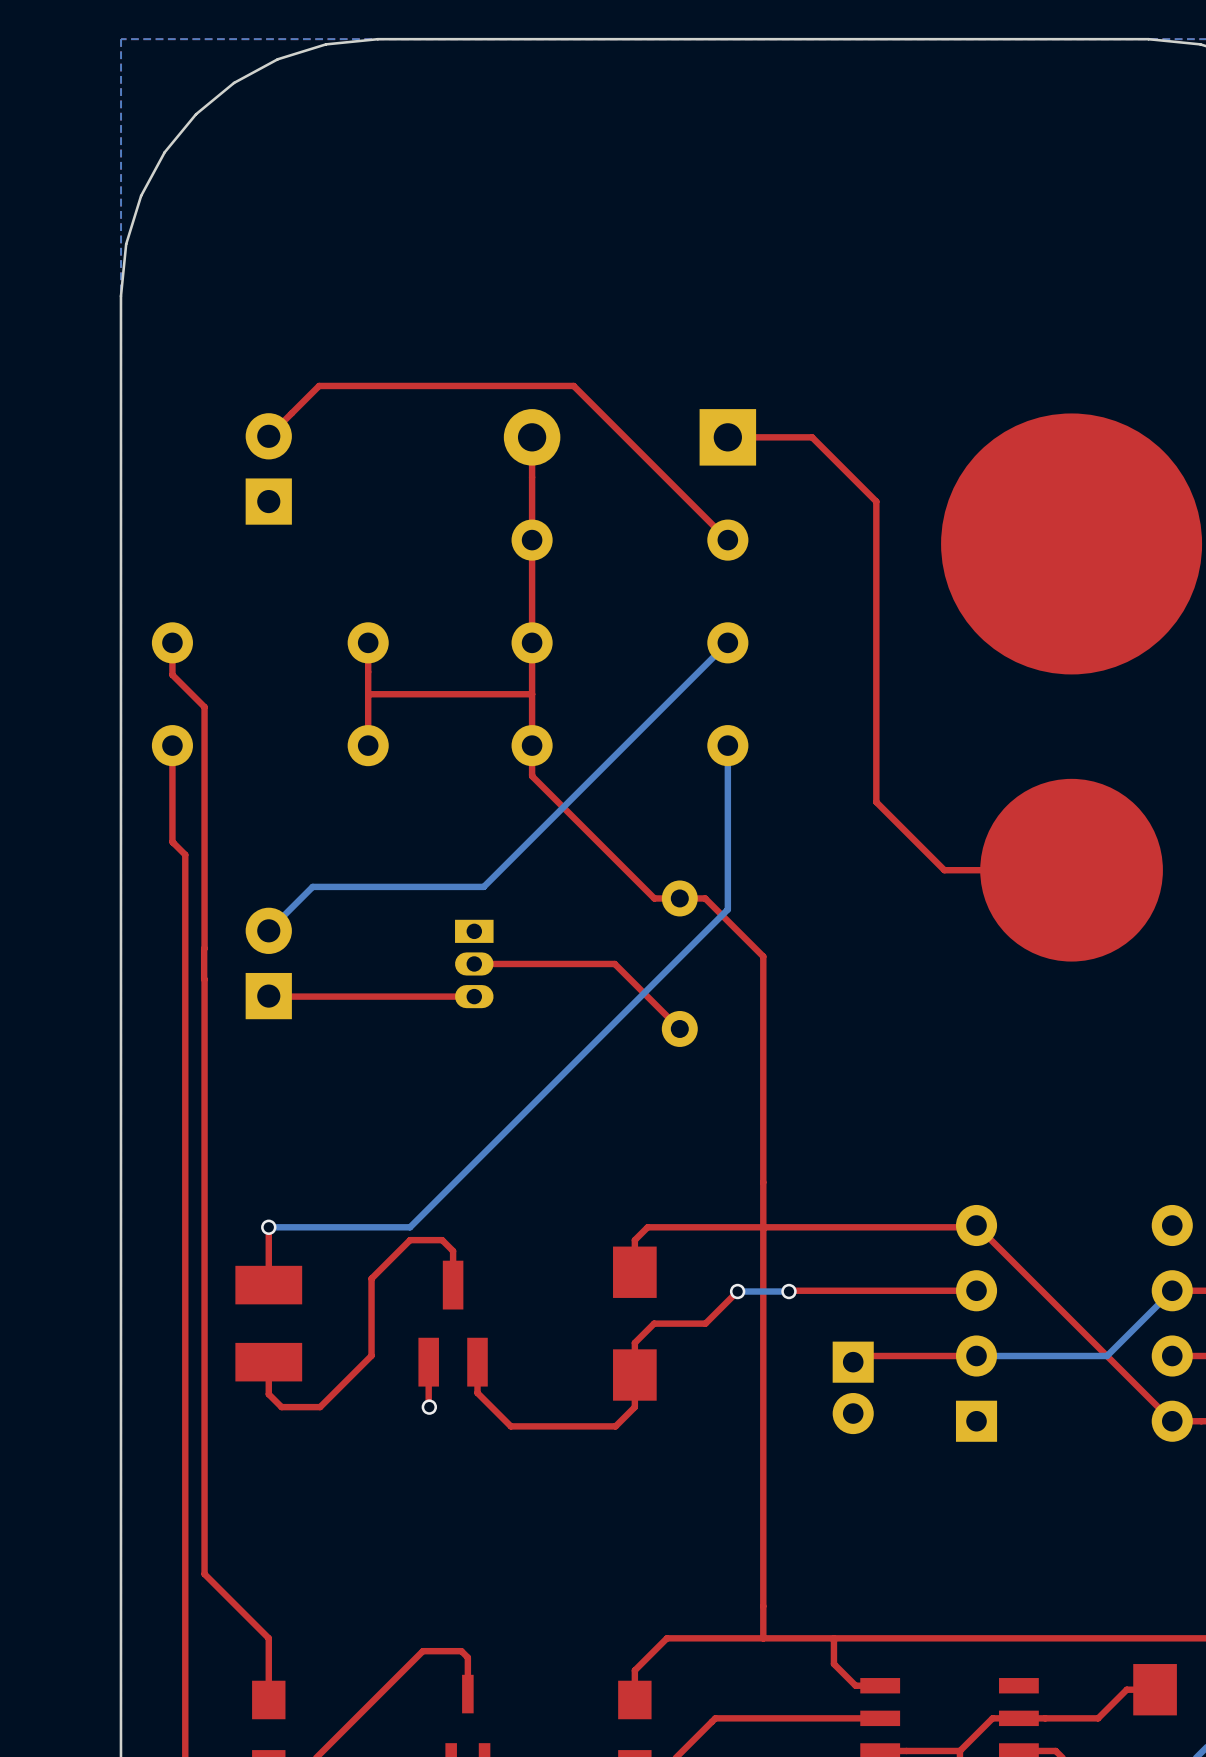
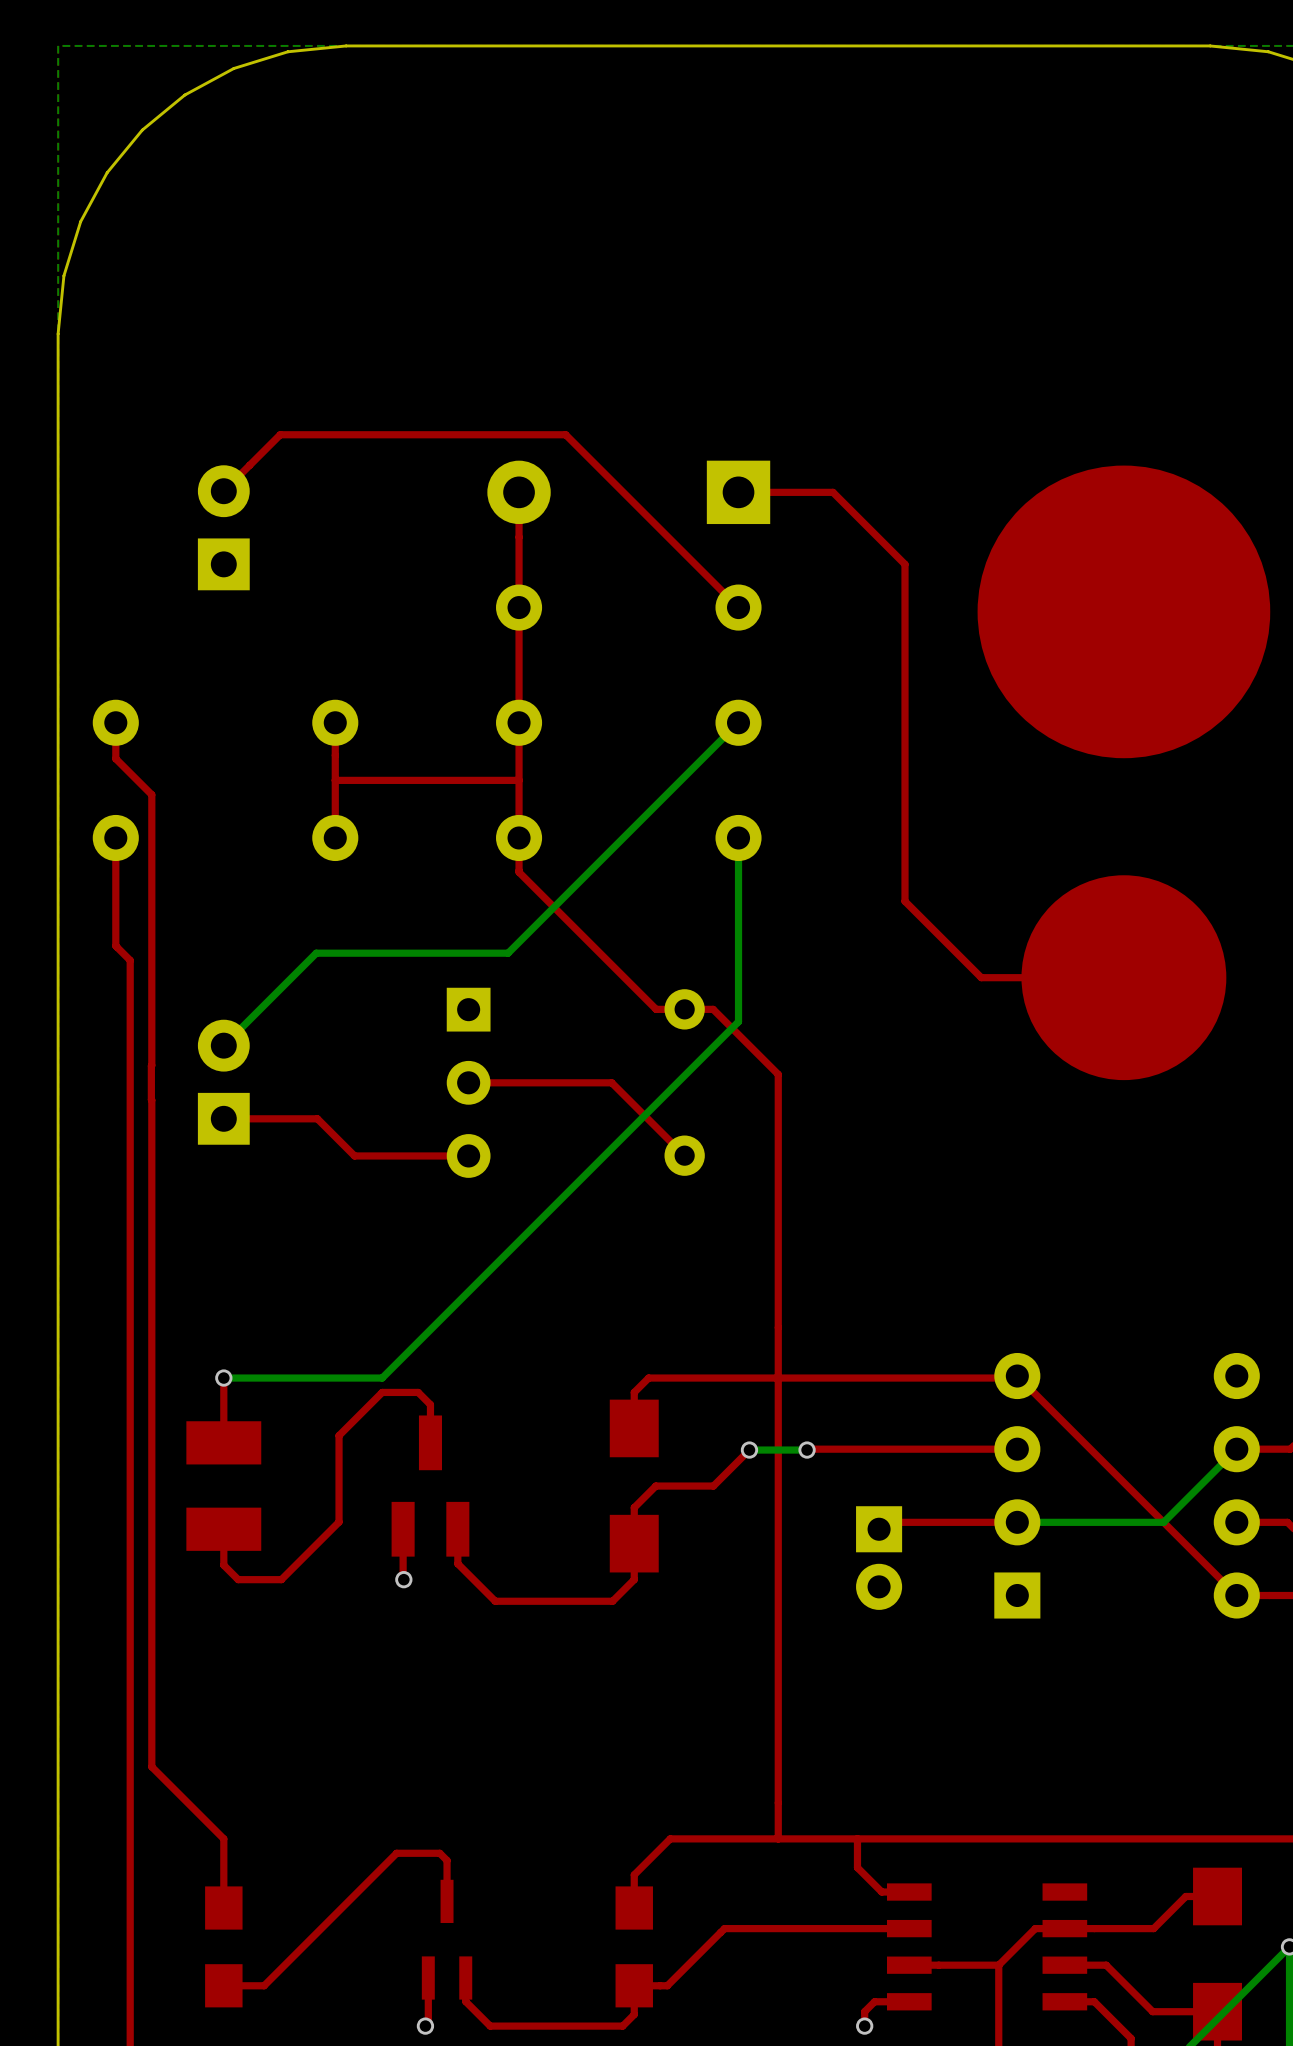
bottom track: (522, 848) (483, 886) (312, 886) -> (508, 953) (316, 953) (273, 996)
part footprint: [455, 919, 494, 1009] -> [446, 987, 491, 1178]
top track: (474, 996) (269, 996) -> (468, 1155) (354, 1155) (317, 1118) (223, 1118)

